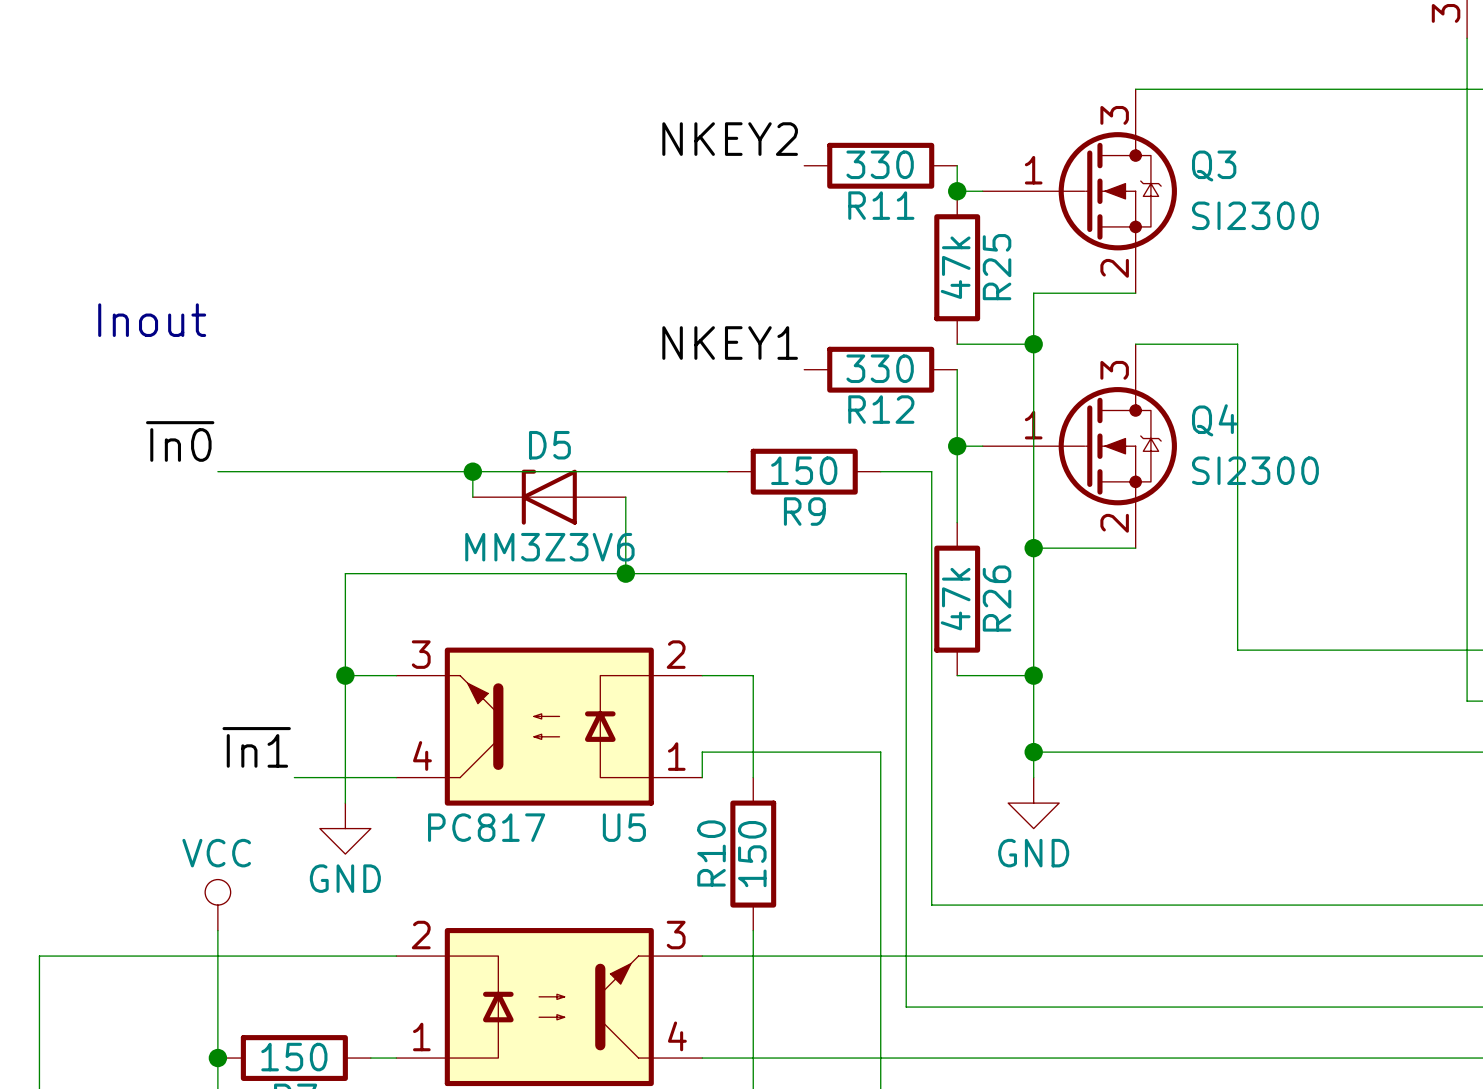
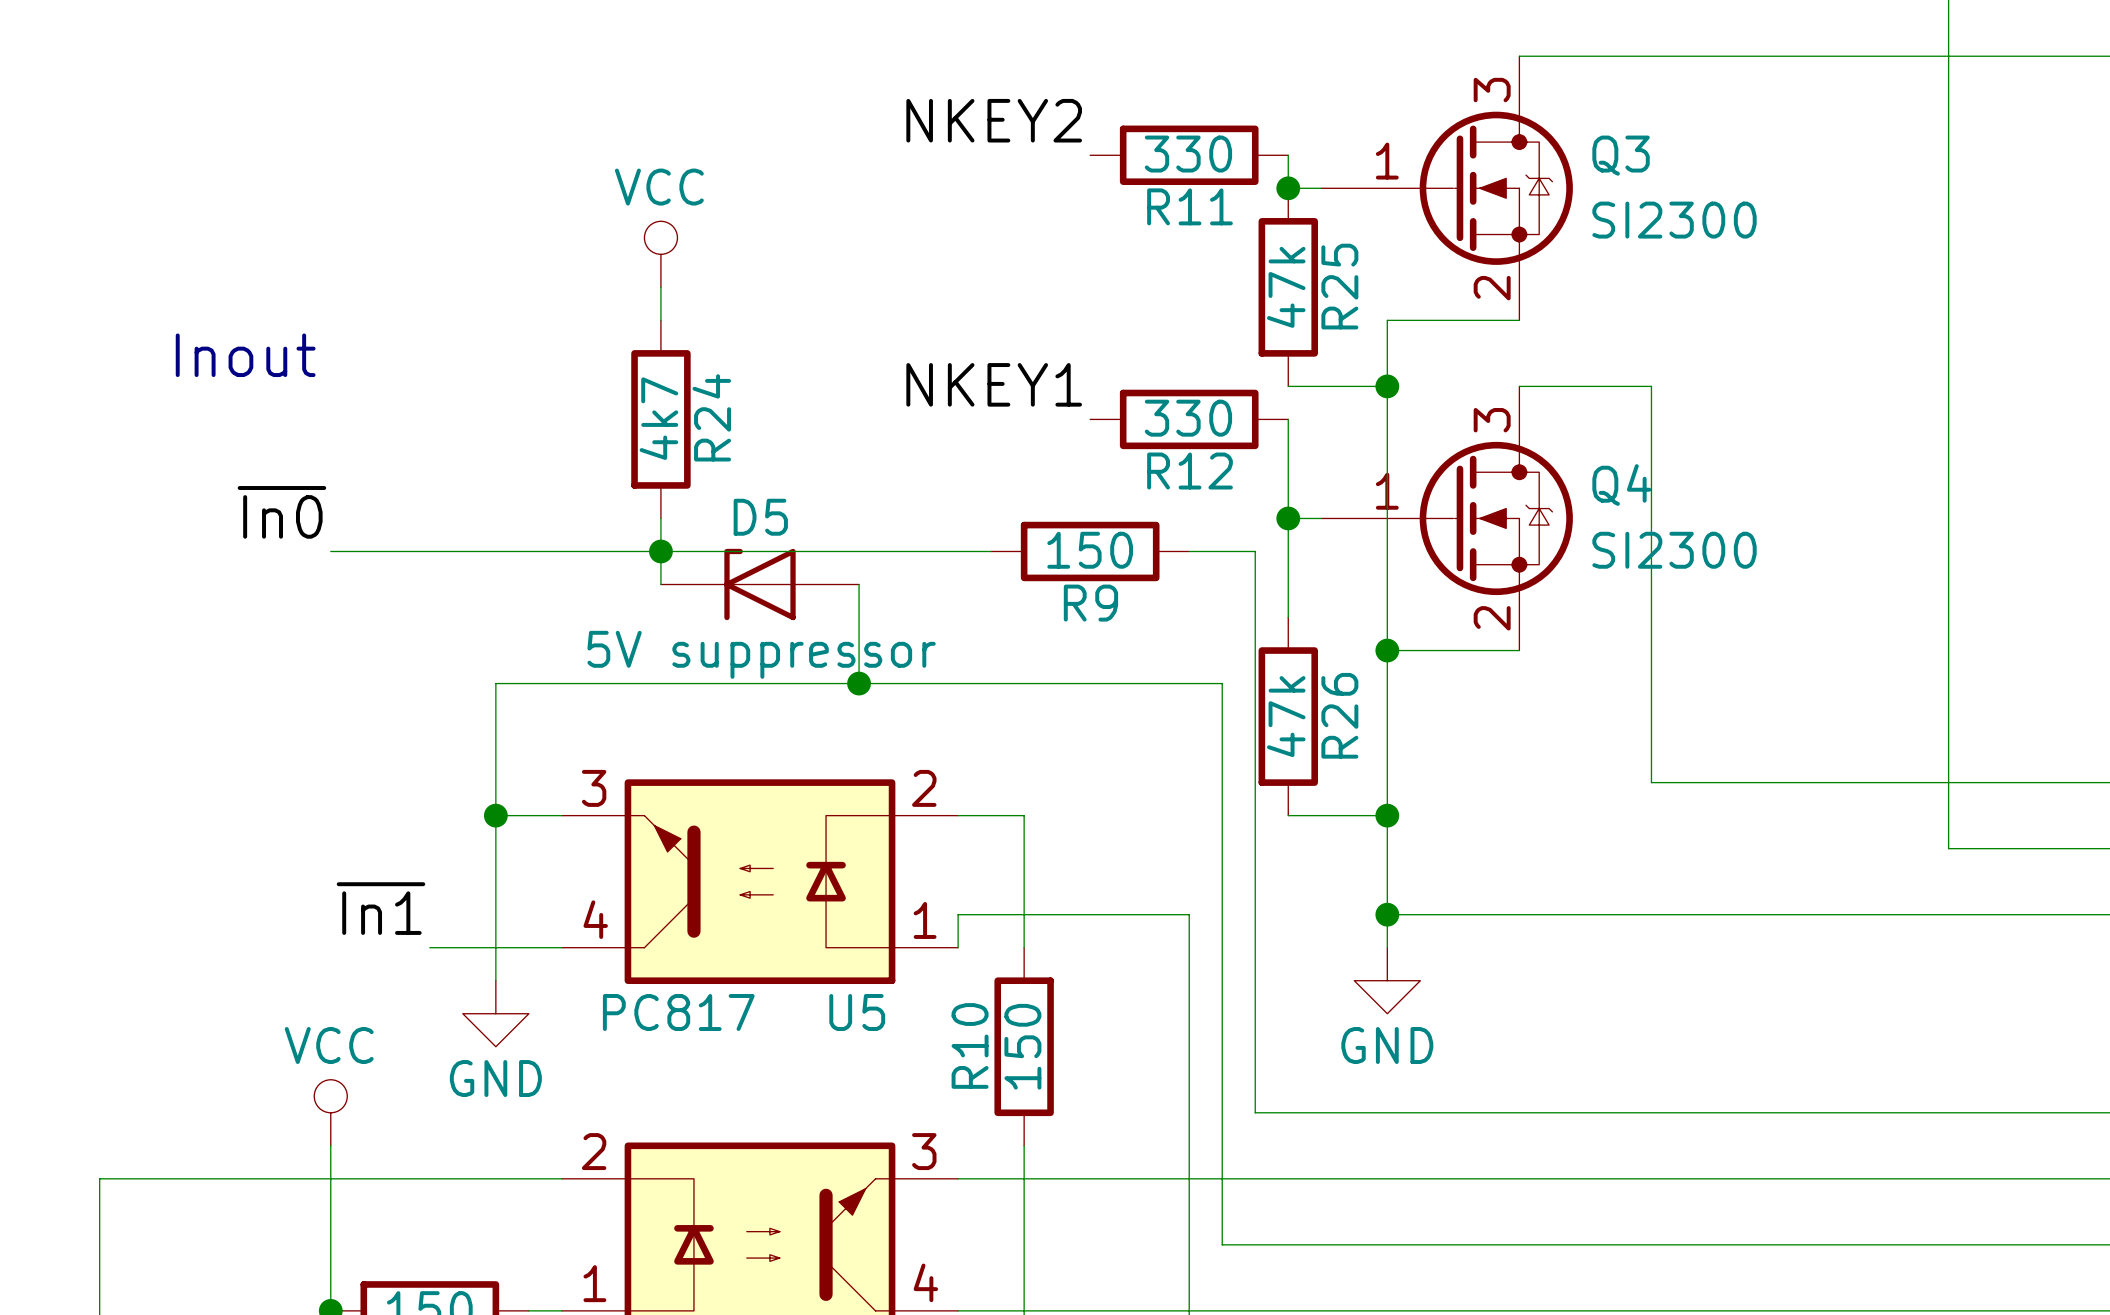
power symbol: none -> VCC (660, 254)
wire: none -> (660, 287) (660, 320)
R24: none -> 4k7 (660, 419)
wire: none -> (660, 518) (660, 551)
D5 value: MM3Z3V6 (549, 547) -> 5V suppressor (761, 654)

